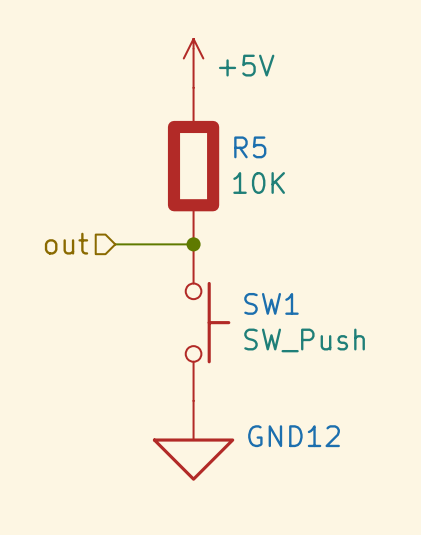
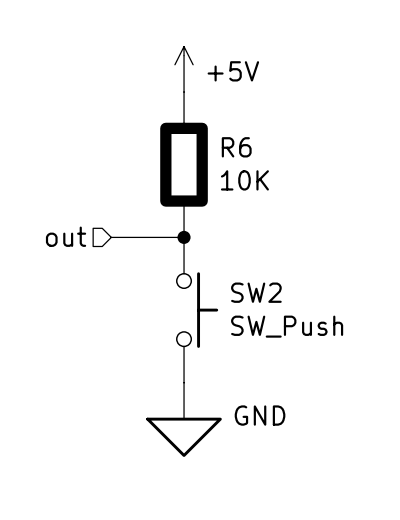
R5 name: R5 (250, 147) -> R6 (236, 147)
SW1 name: SW1 (271, 303) -> SW2 (256, 292)
GND12 name: GND12 (294, 436) -> GND (260, 415)

